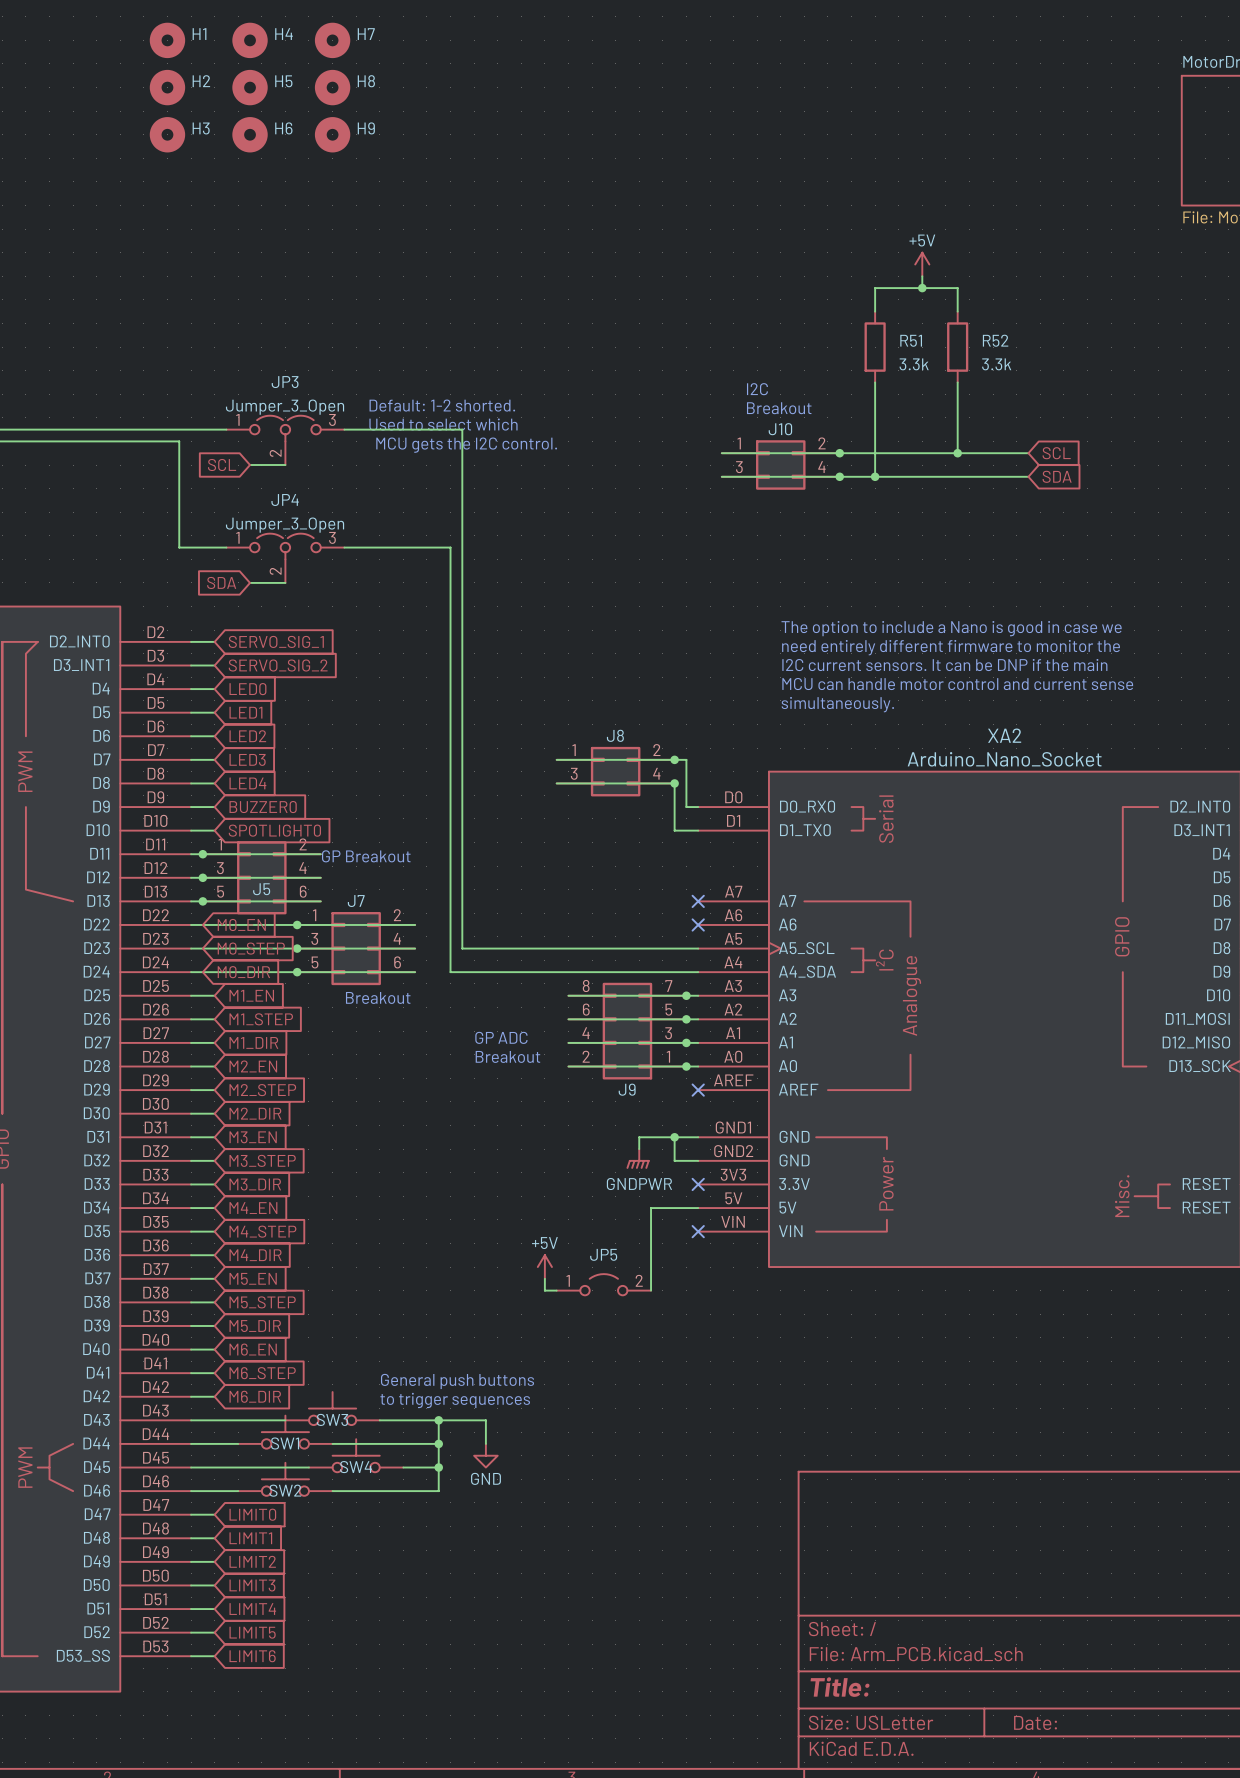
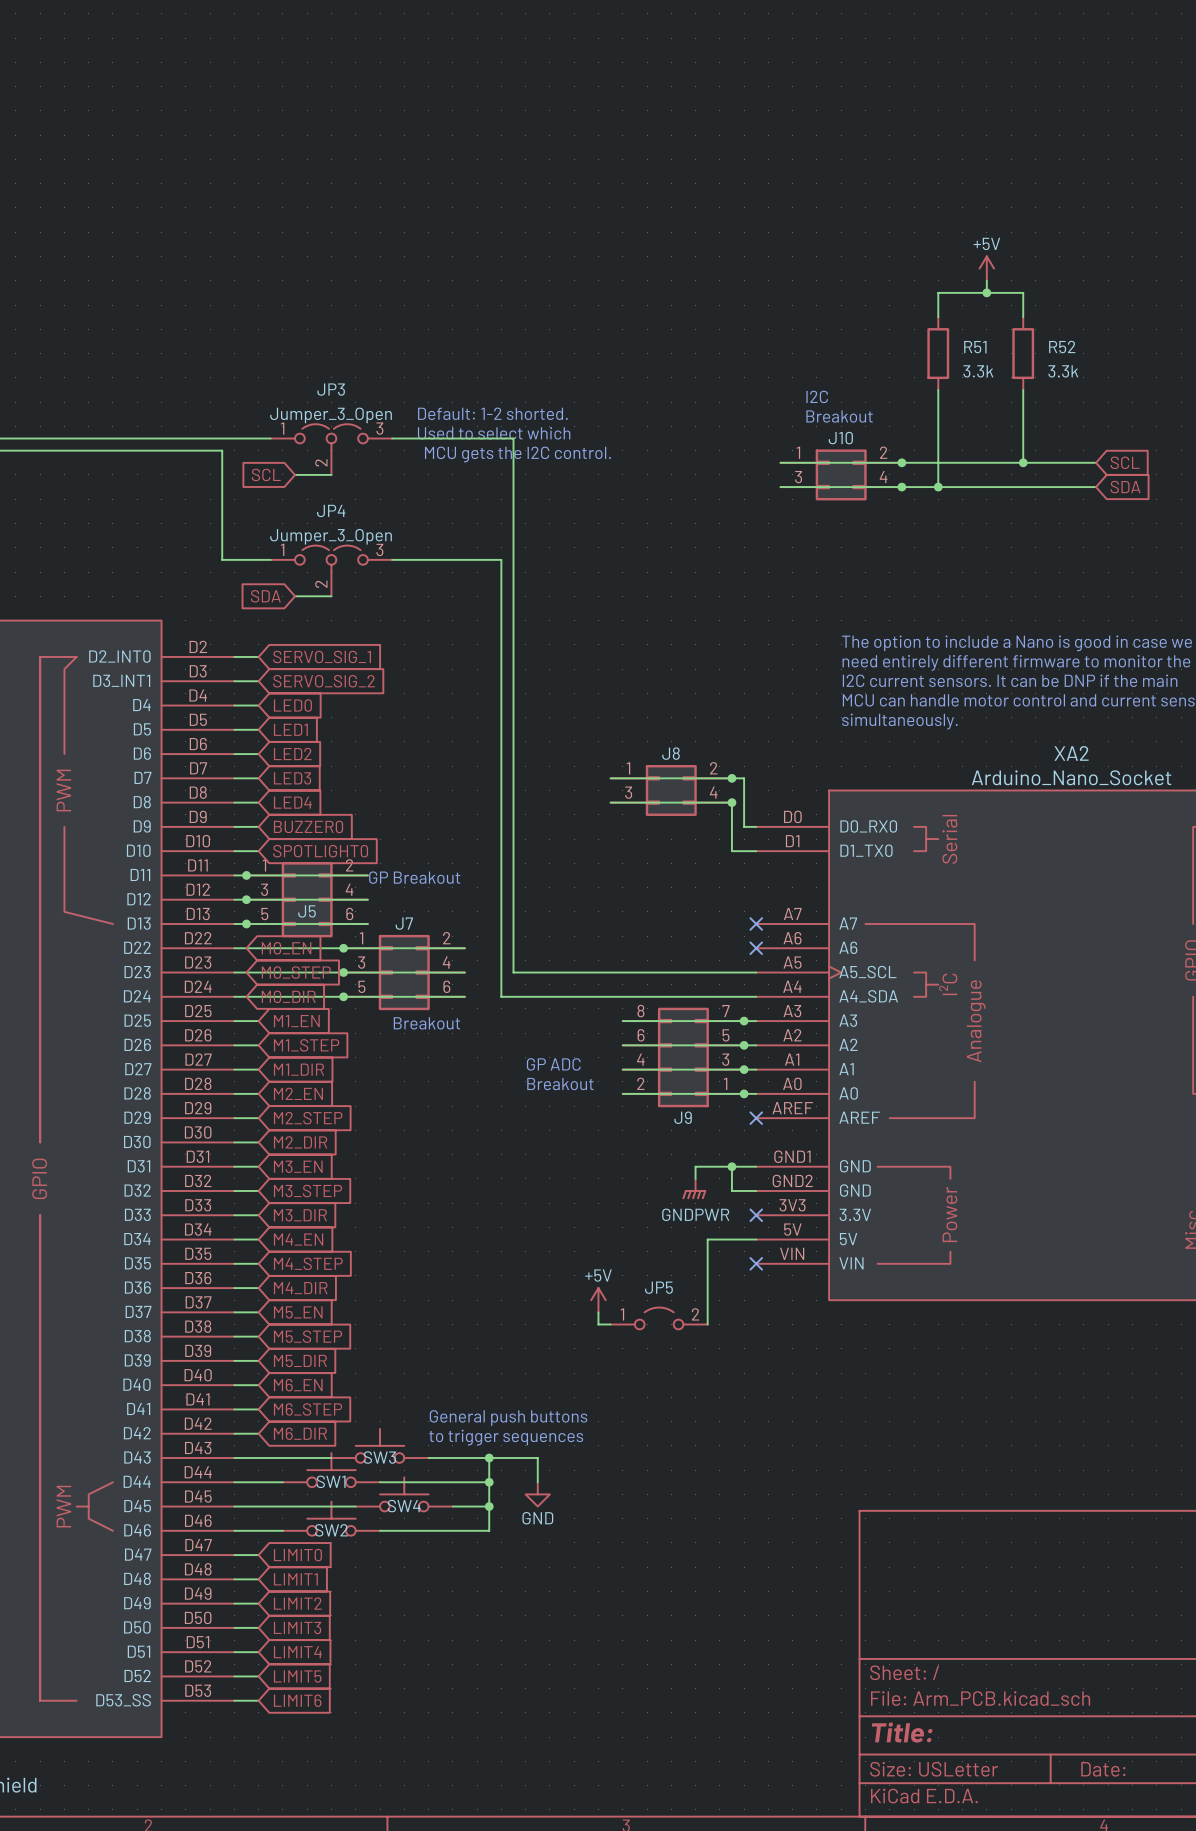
H1: (167, 40) -> none
H4: (250, 40) -> none
H7: (332, 40) -> none
H2: (167, 87) -> none
H5: (250, 87) -> none
H8: (332, 87) -> none
H3: (167, 134) -> none
H6: (250, 134) -> none
H9: (332, 134) -> none

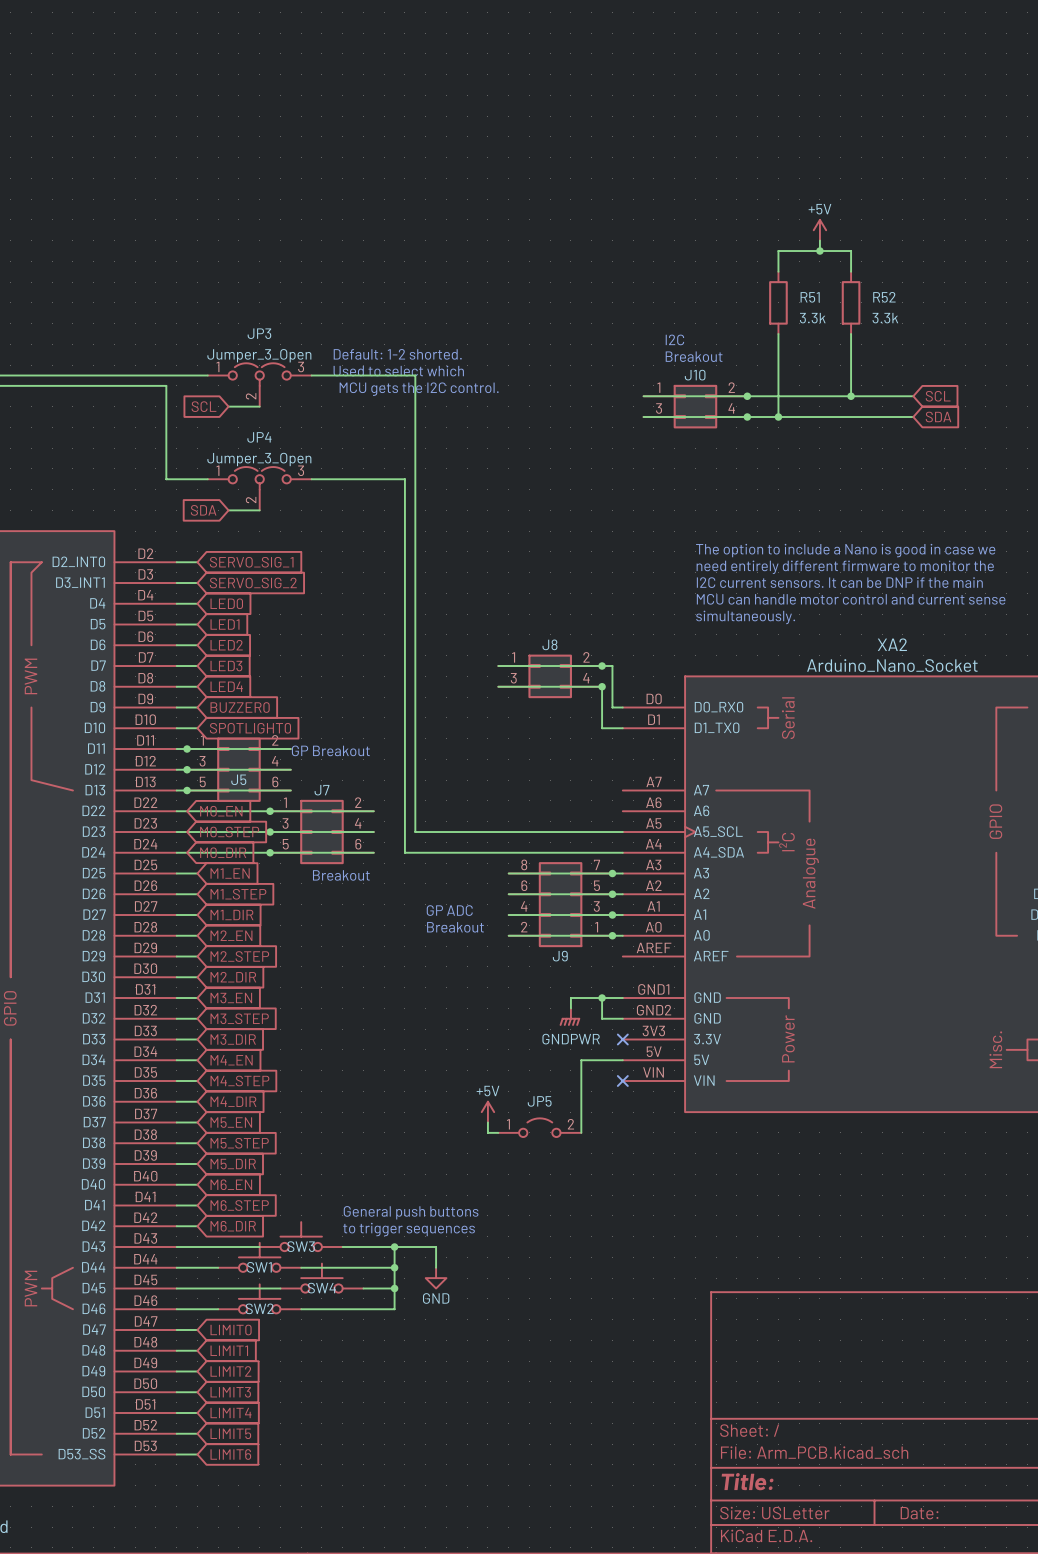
no-connect mark: (756, 923) -> none
no-connect mark: (756, 948) -> none
no-connect mark: (756, 1118) -> none

